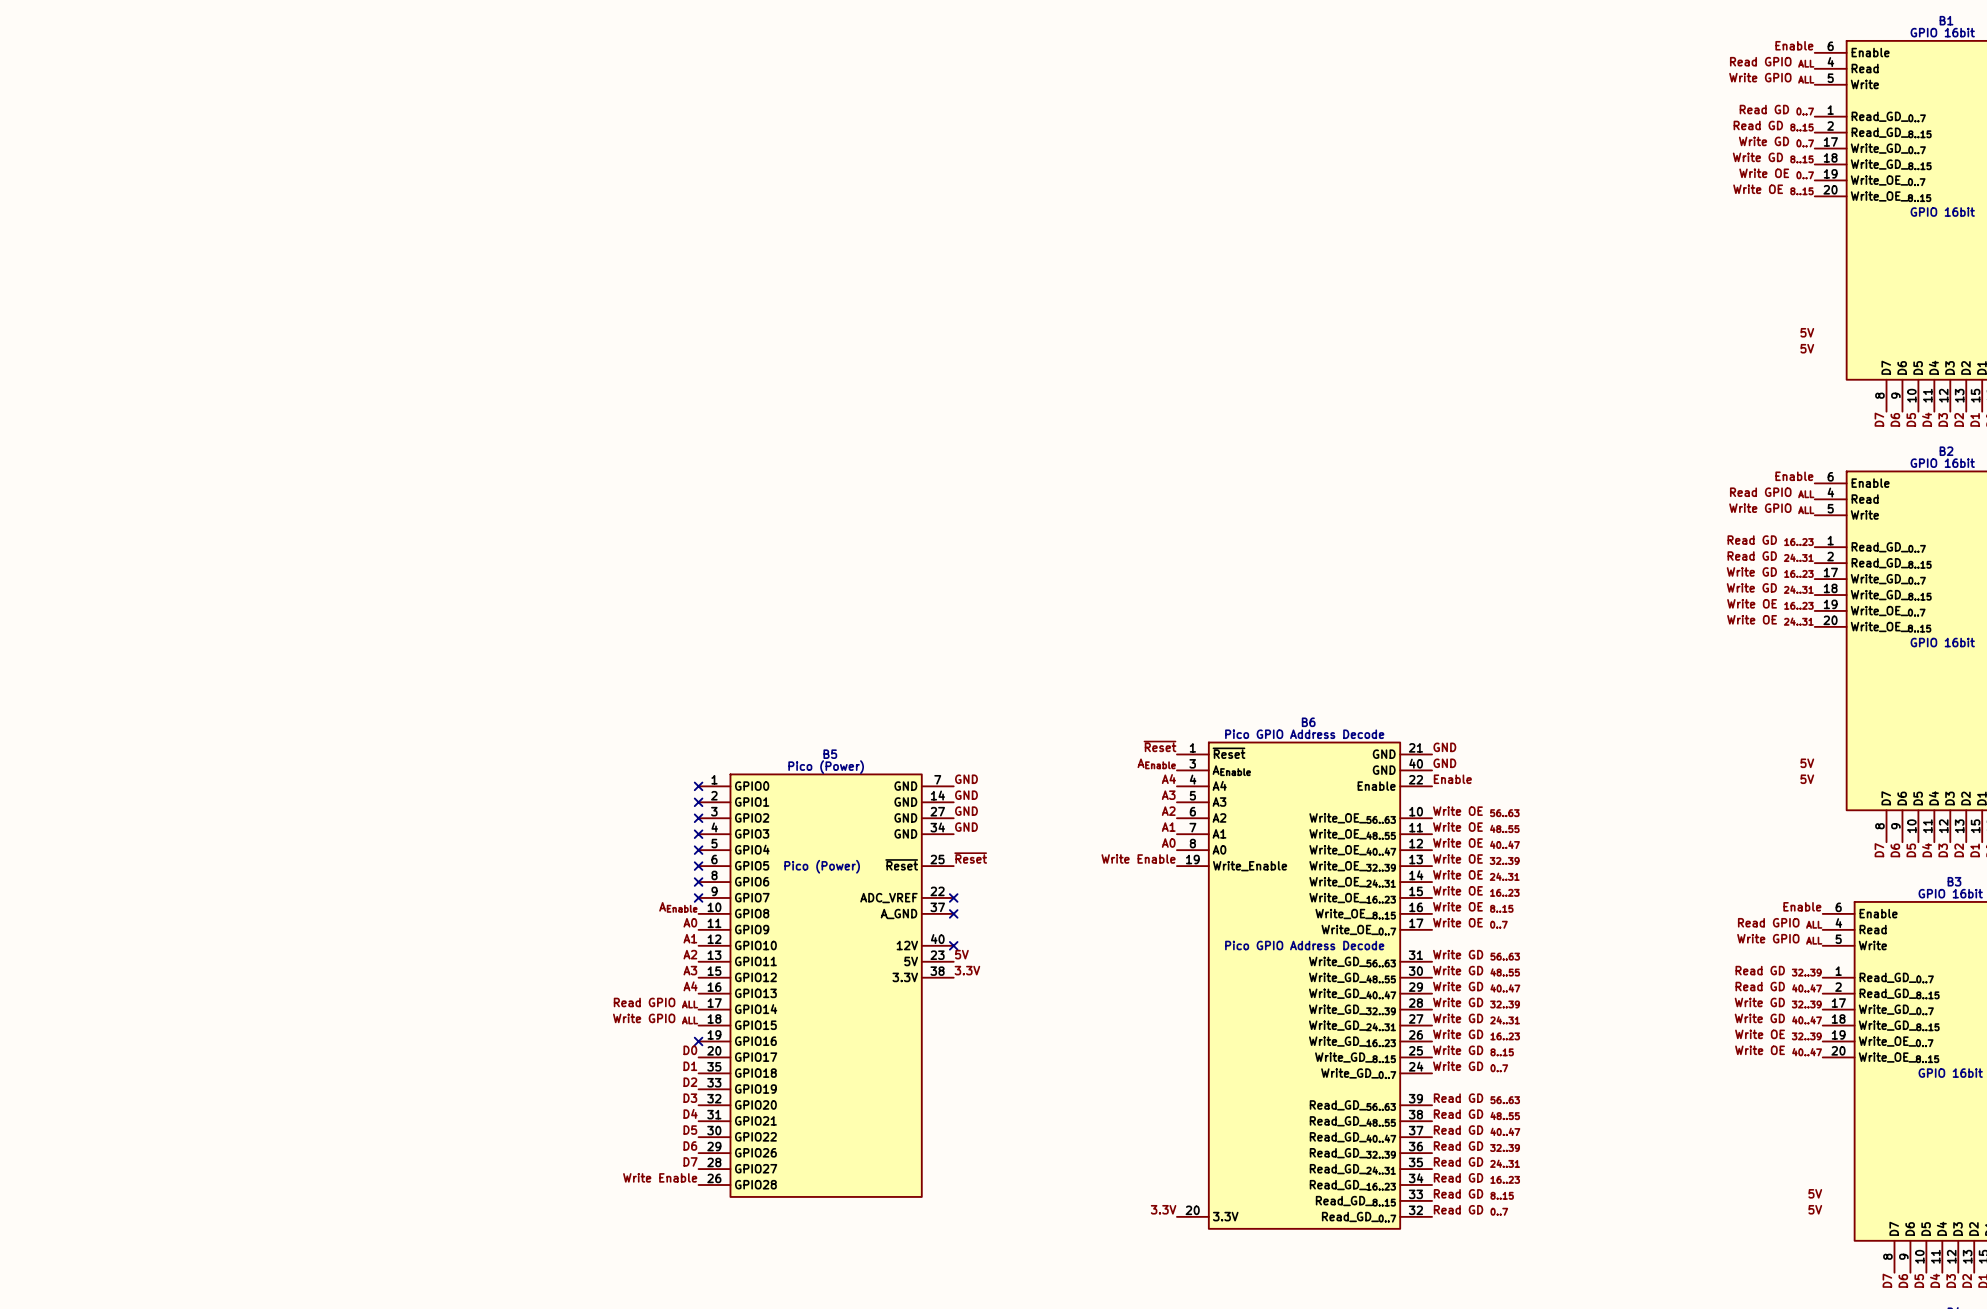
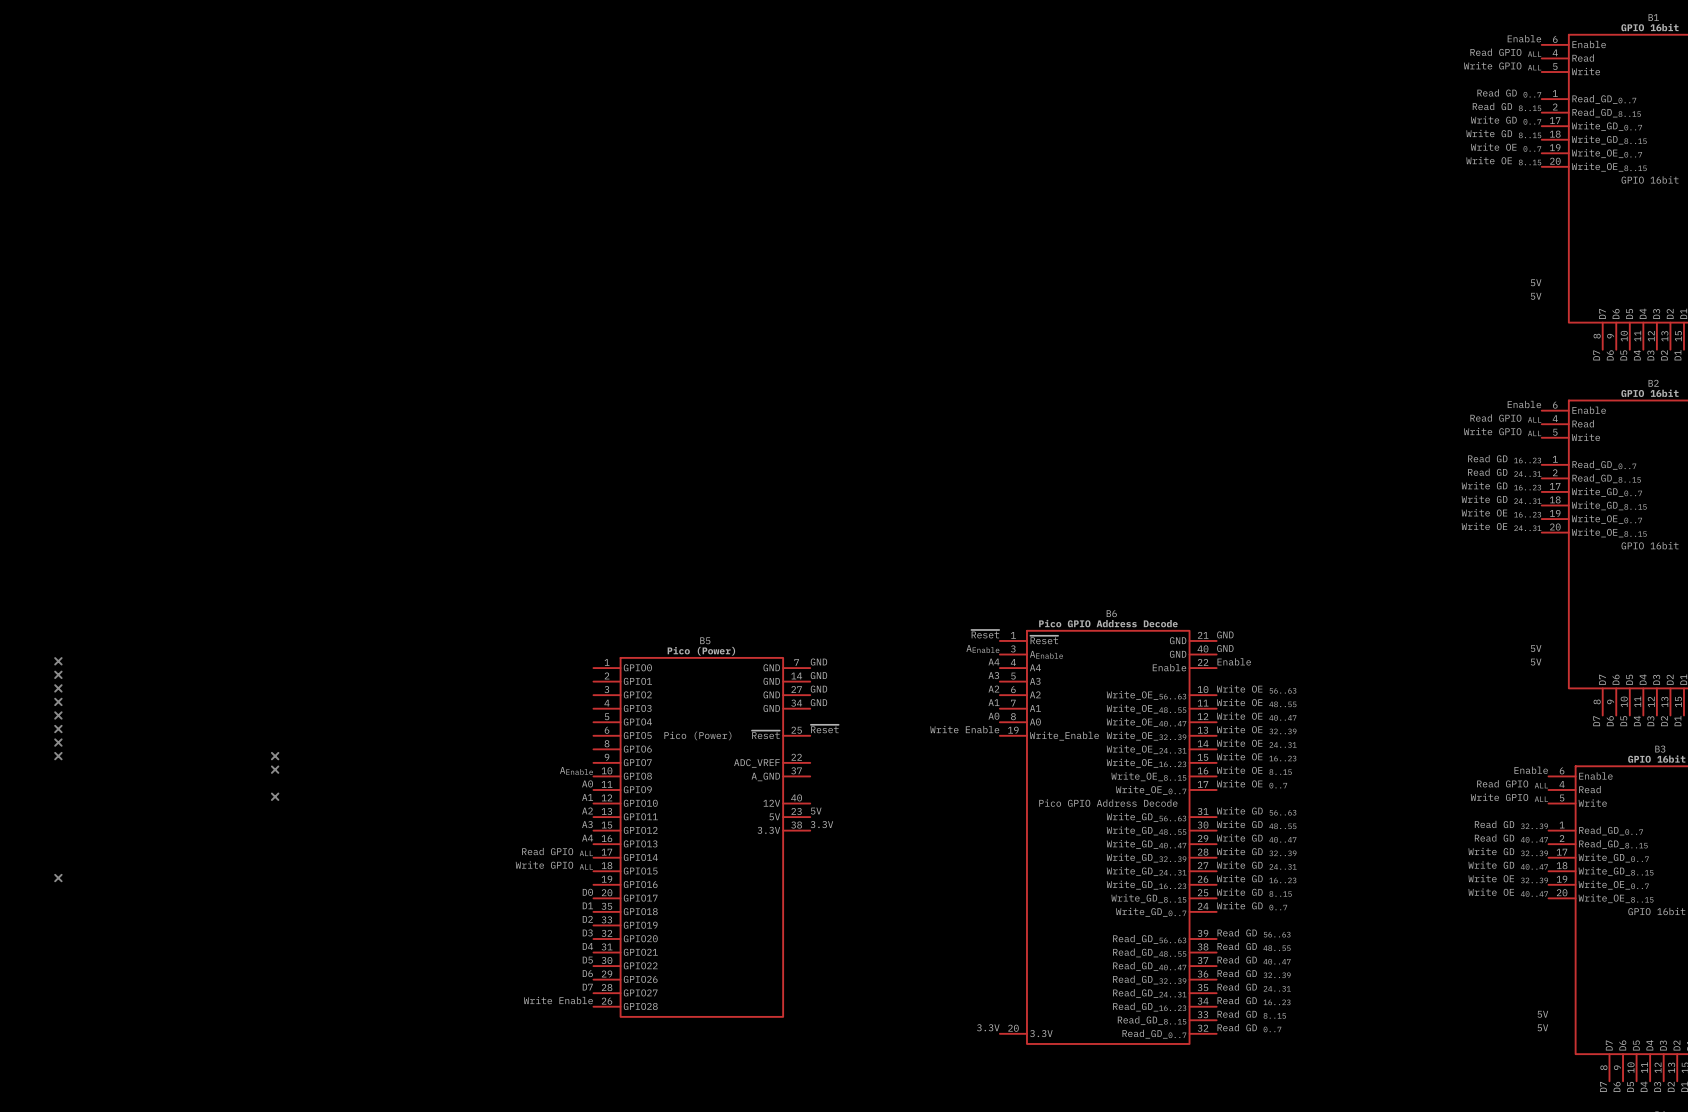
no-connect mark: none -> (58, 661)
no-connect mark: (698, 786) -> none
no-connect mark: none -> (58, 674)
no-connect mark: (698, 802) -> none
no-connect mark: none -> (58, 688)
no-connect mark: (698, 818) -> none
no-connect mark: none -> (58, 701)
no-connect mark: (698, 834) -> none
no-connect mark: none -> (58, 715)
no-connect mark: (698, 850) -> none
no-connect mark: none -> (58, 729)
no-connect mark: (698, 866) -> none
no-connect mark: none -> (58, 742)
no-connect mark: (698, 882) -> none
no-connect mark: none -> (58, 756)
no-connect mark: none -> (275, 756)
no-connect mark: (698, 897) -> none
no-connect mark: (953, 897) -> none
no-connect mark: none -> (275, 769)
no-connect mark: (953, 913) -> none
no-connect mark: none -> (275, 796)
no-connect mark: (953, 945) -> none
no-connect mark: none -> (58, 878)
no-connect mark: (698, 1041) -> none

